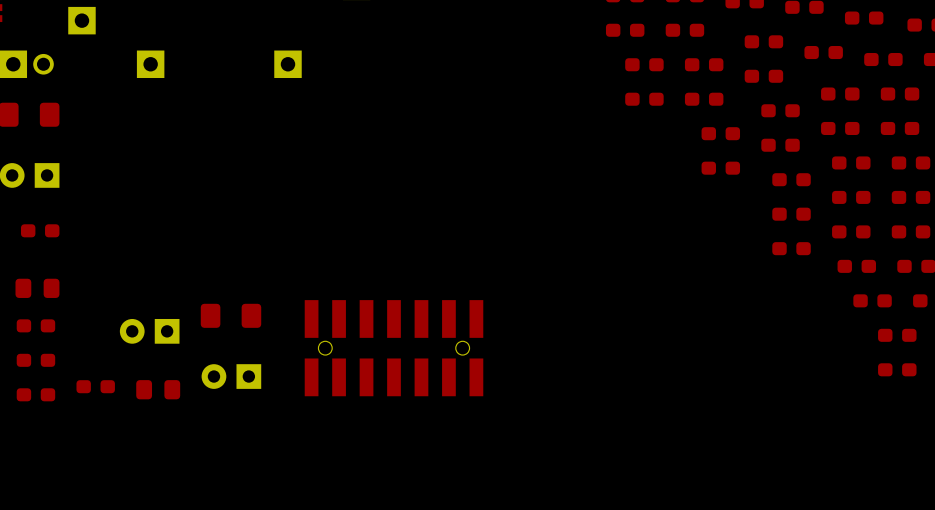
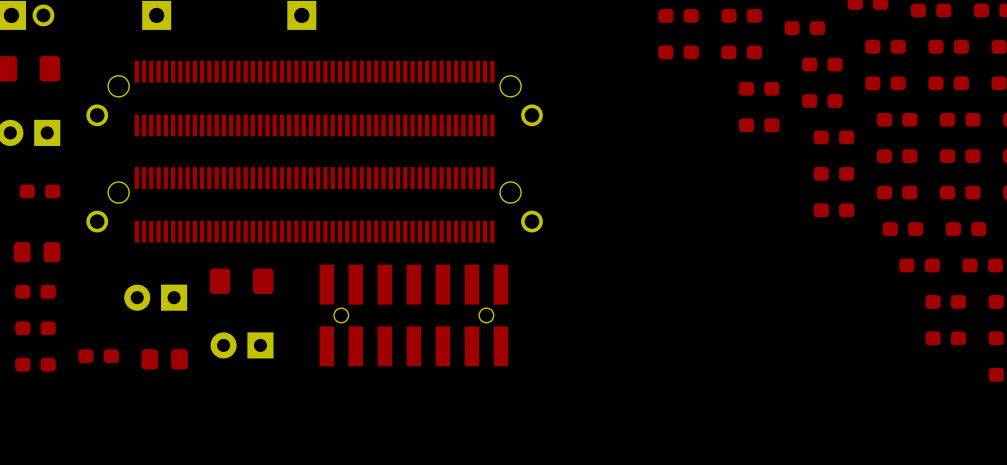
part: none -> (314, 98)
part: none -> (314, 204)

